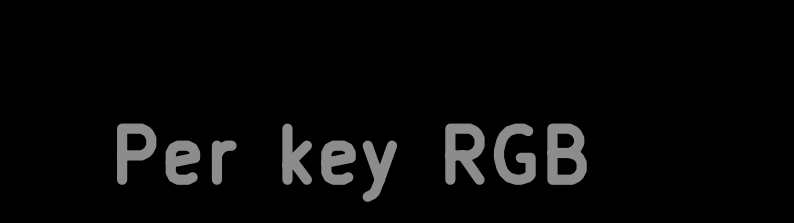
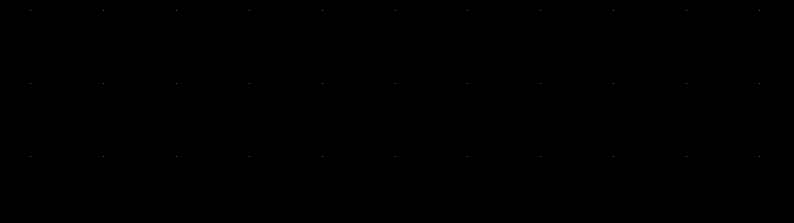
text: Per key RGB (351, 162) -> none

